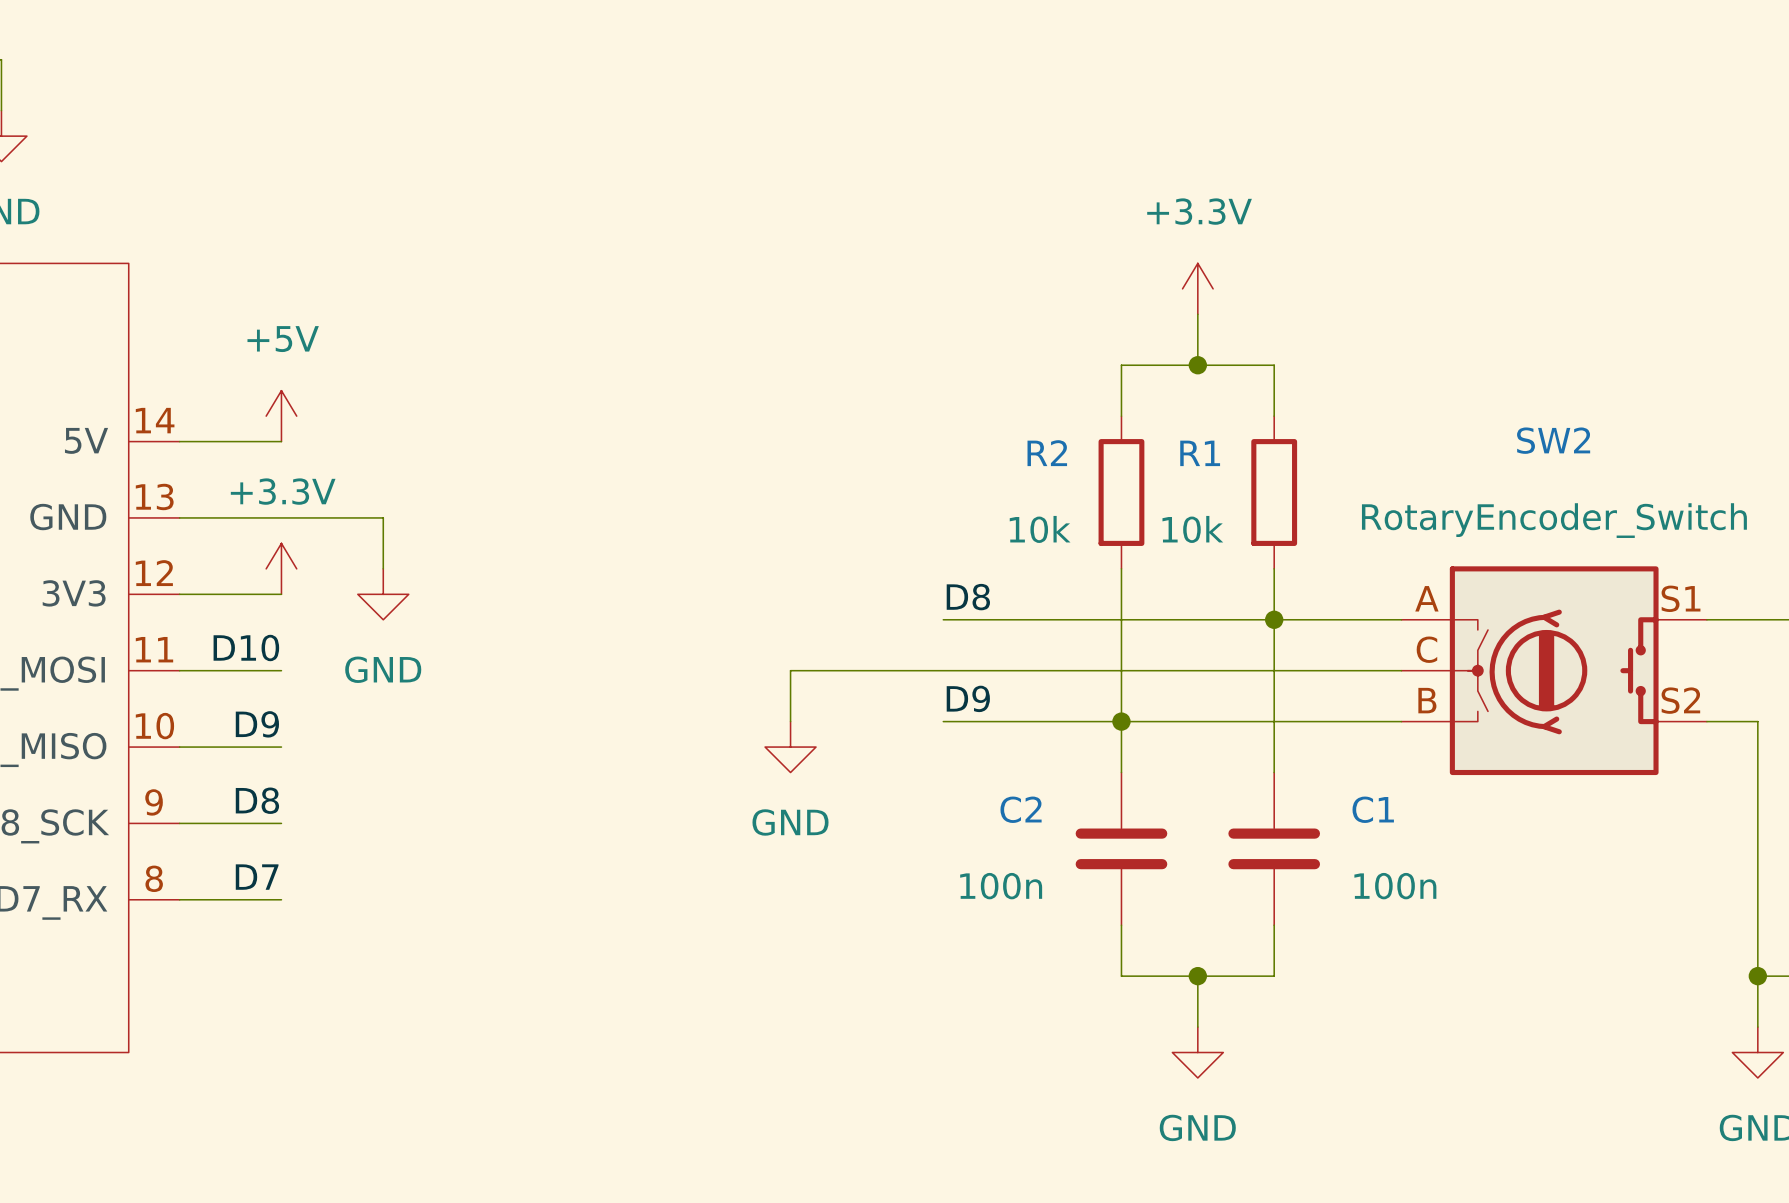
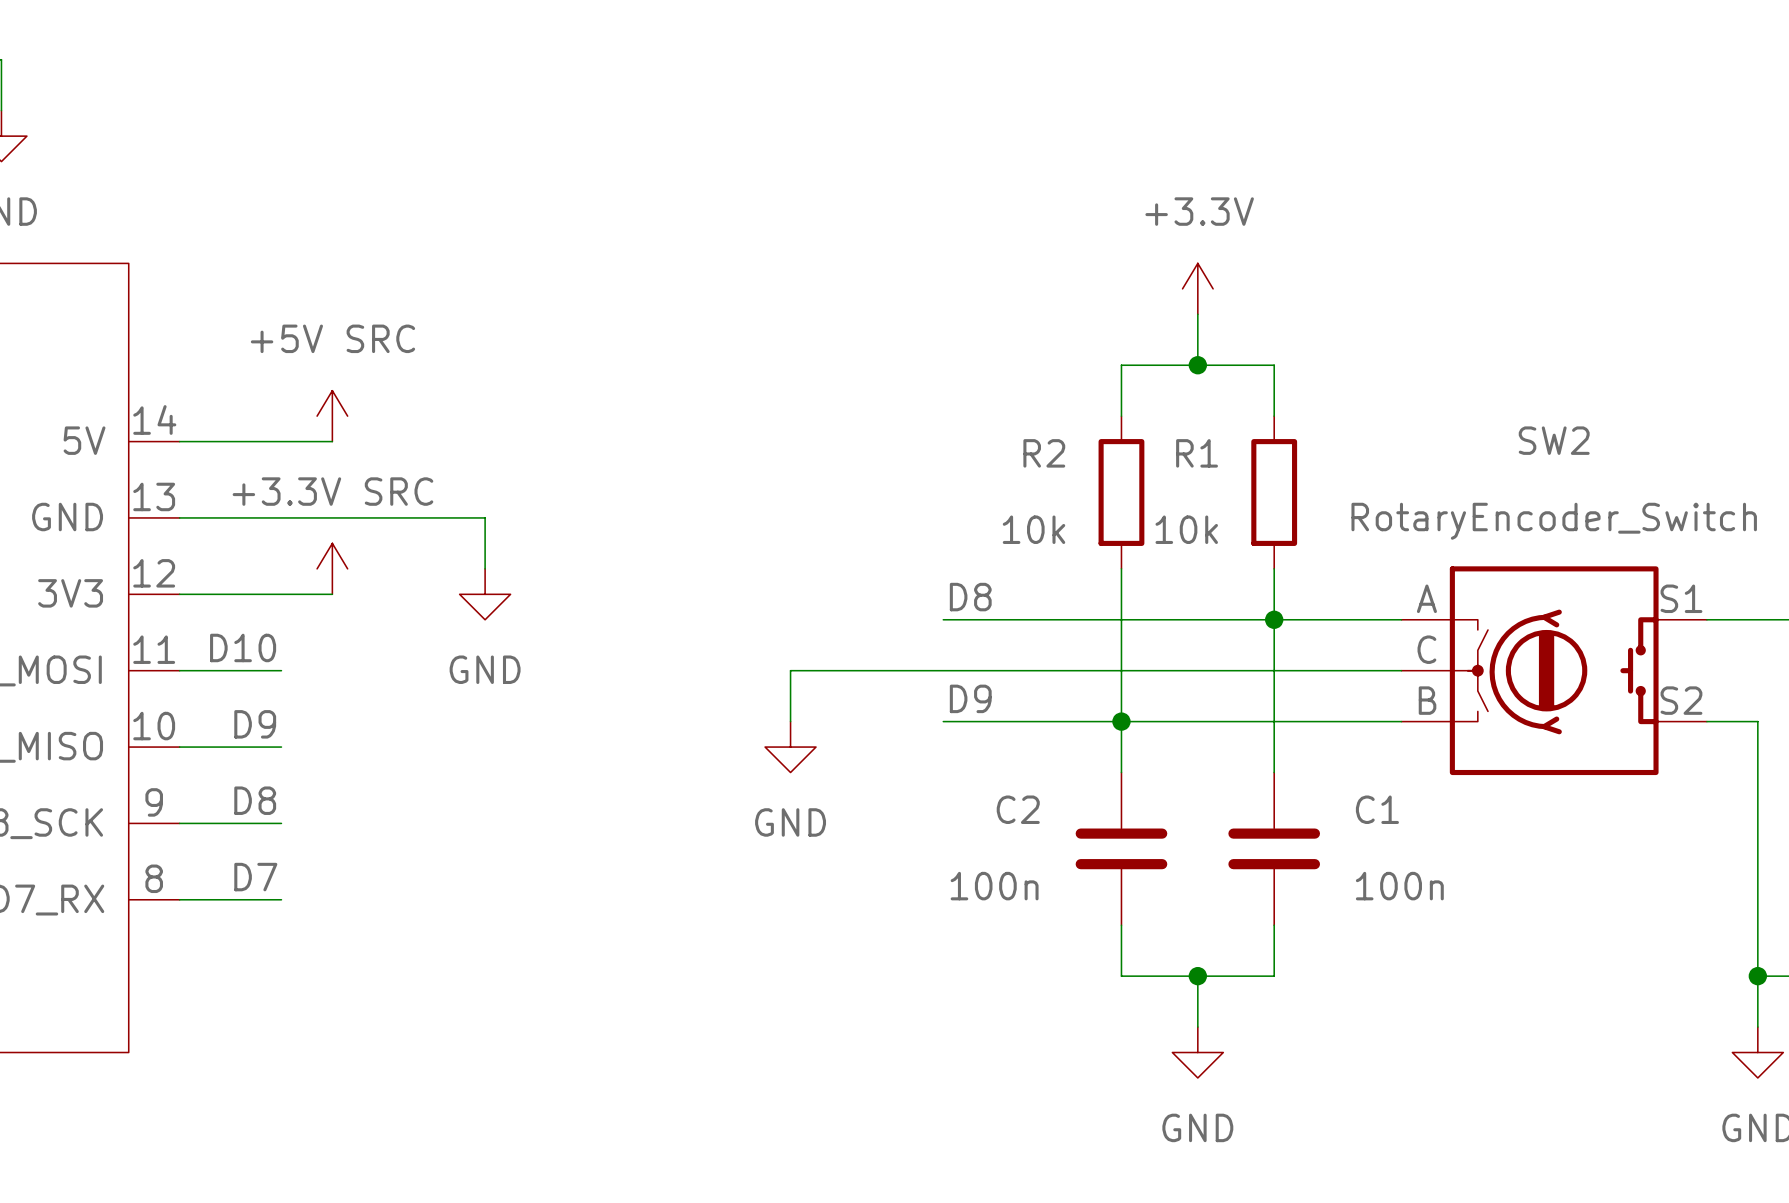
power symbol: +5V (281, 416) -> none
power symbol: none -> +5V SRC (332, 416)
wire: none -> (281, 441) (332, 441)
wire: (383, 517) (383, 568) -> (383, 517) (485, 517) (485, 568)
power symbol: +3.3V (281, 568) -> none
power symbol: none -> +3.3V SRC (332, 568)
wire: none -> (281, 594) (332, 594)
power symbol position: GND (383, 594) -> GND (485, 594)

